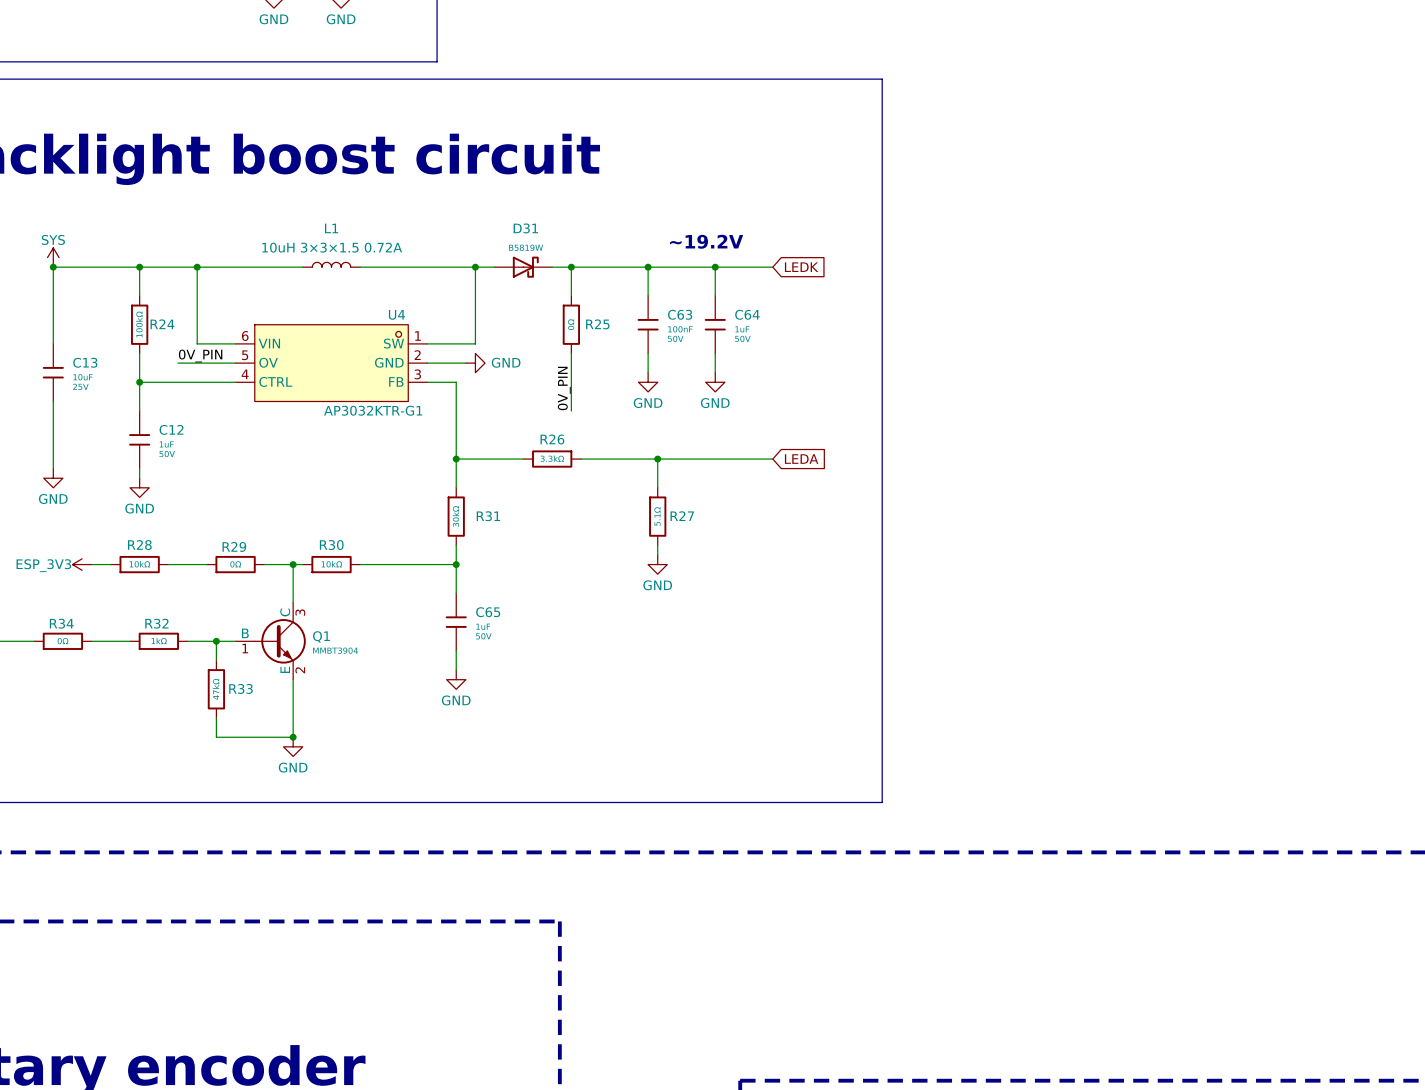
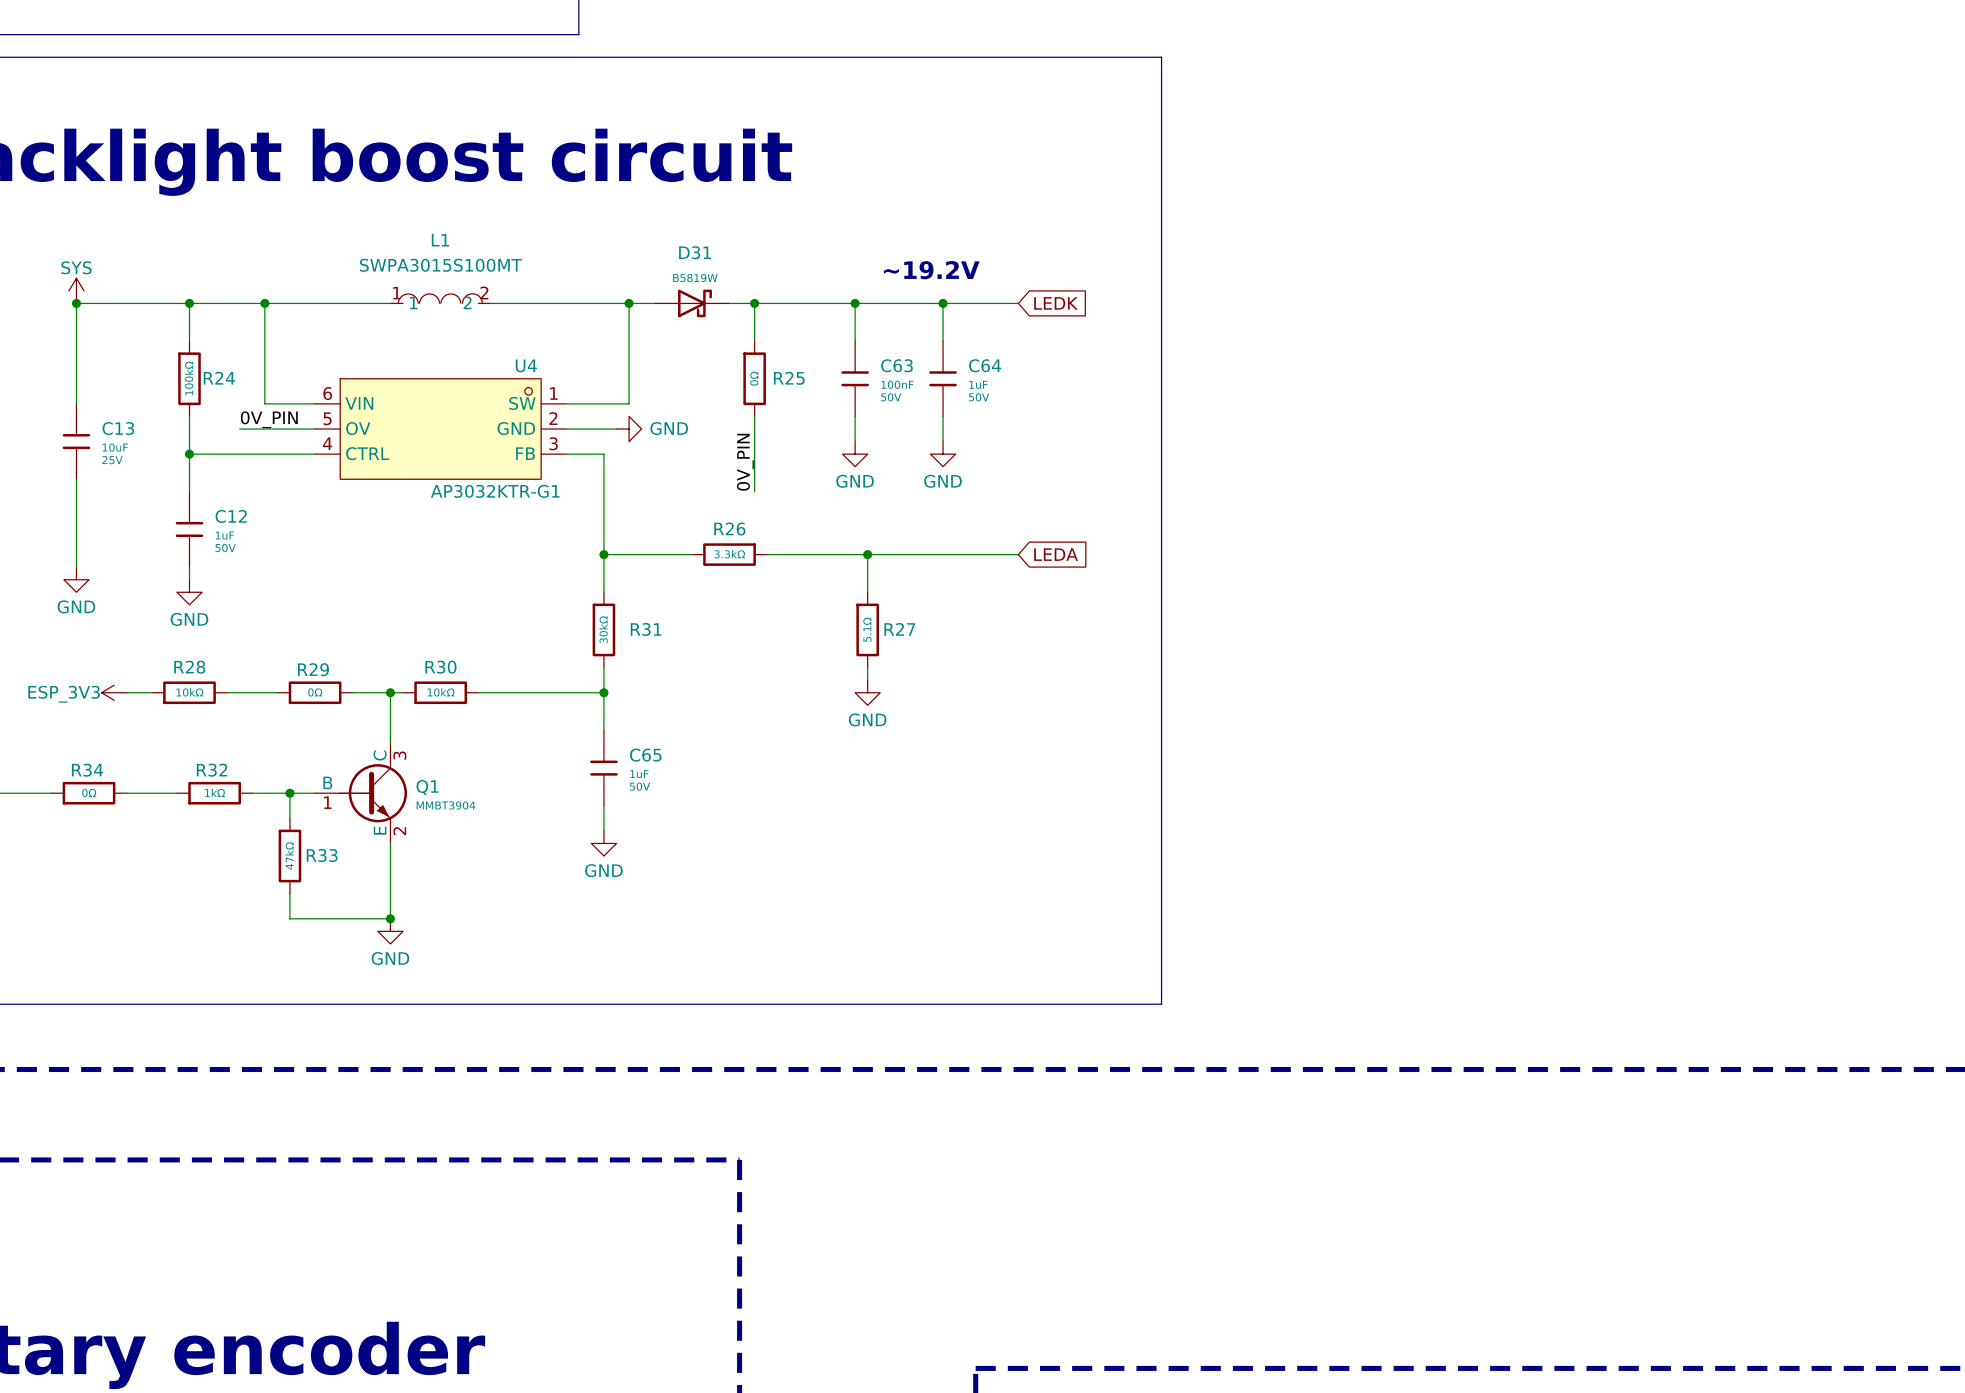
L1 value: 10uH 3×3×1.5 0.72A (332, 247) -> SWPA3015S100MT (440, 265)
L1 symbol: [302, 262, 361, 268] -> [390, 293, 491, 304]

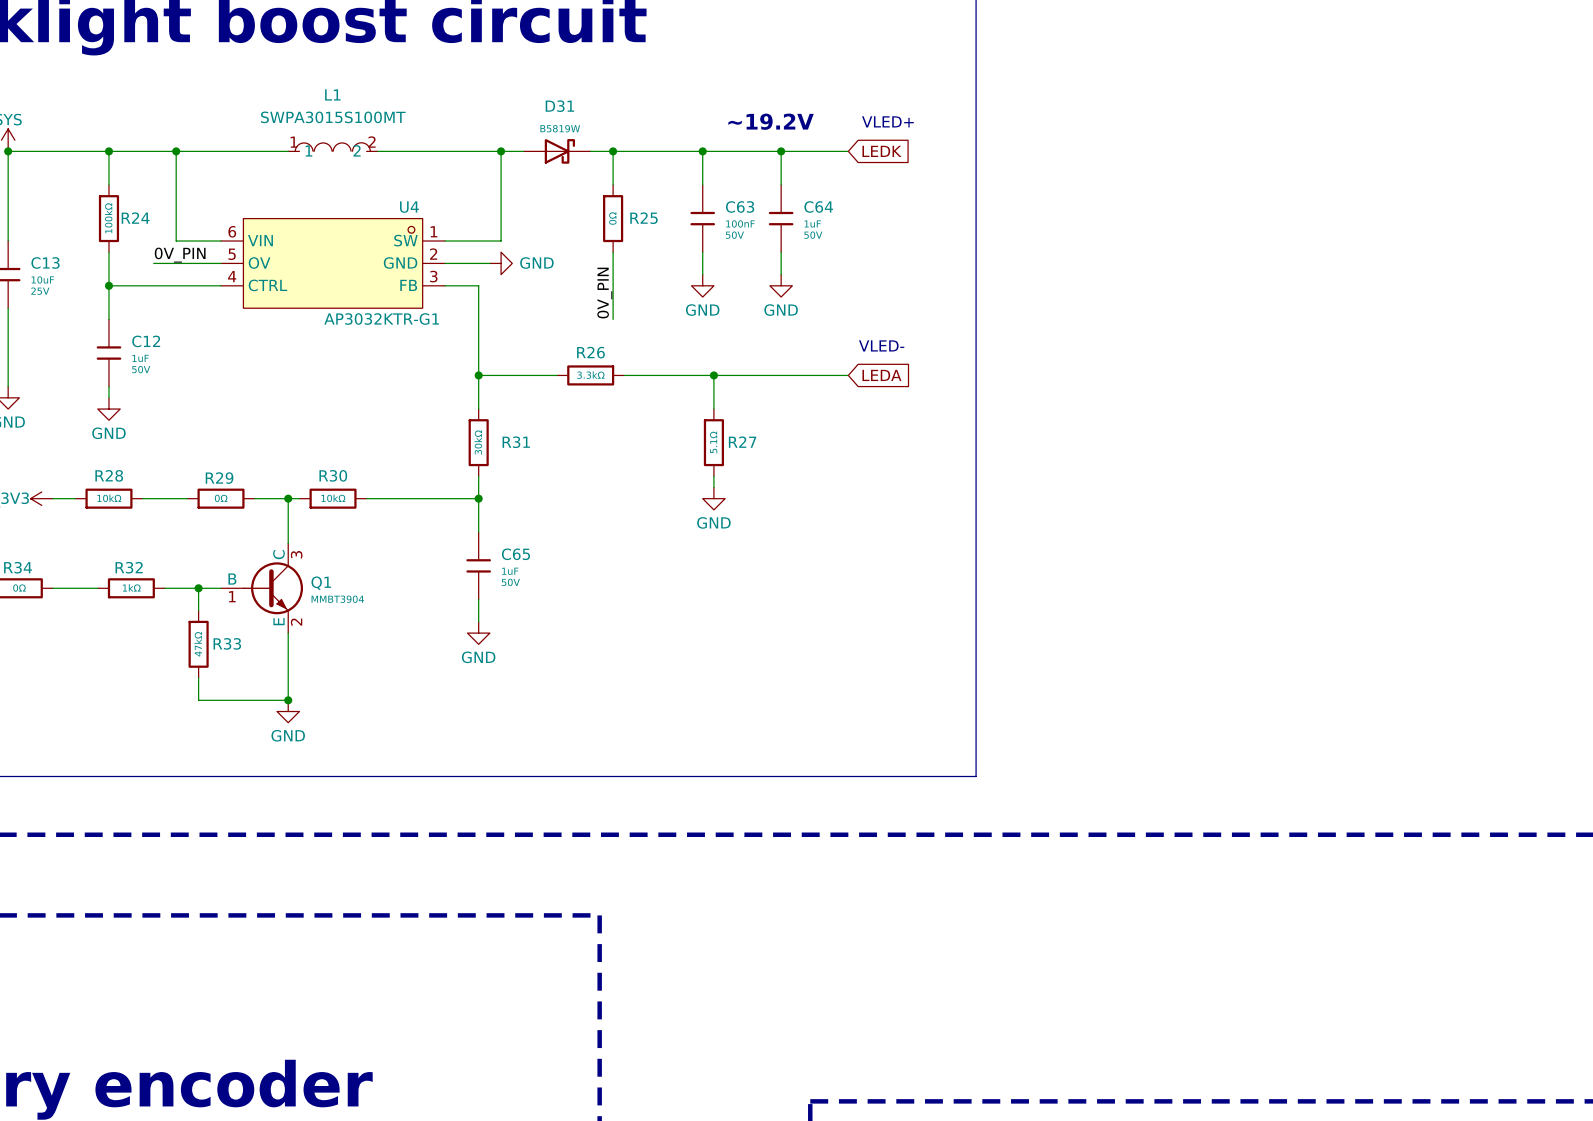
text: none -> VLED+ (887, 121)
text: none -> VLED- (881, 345)

